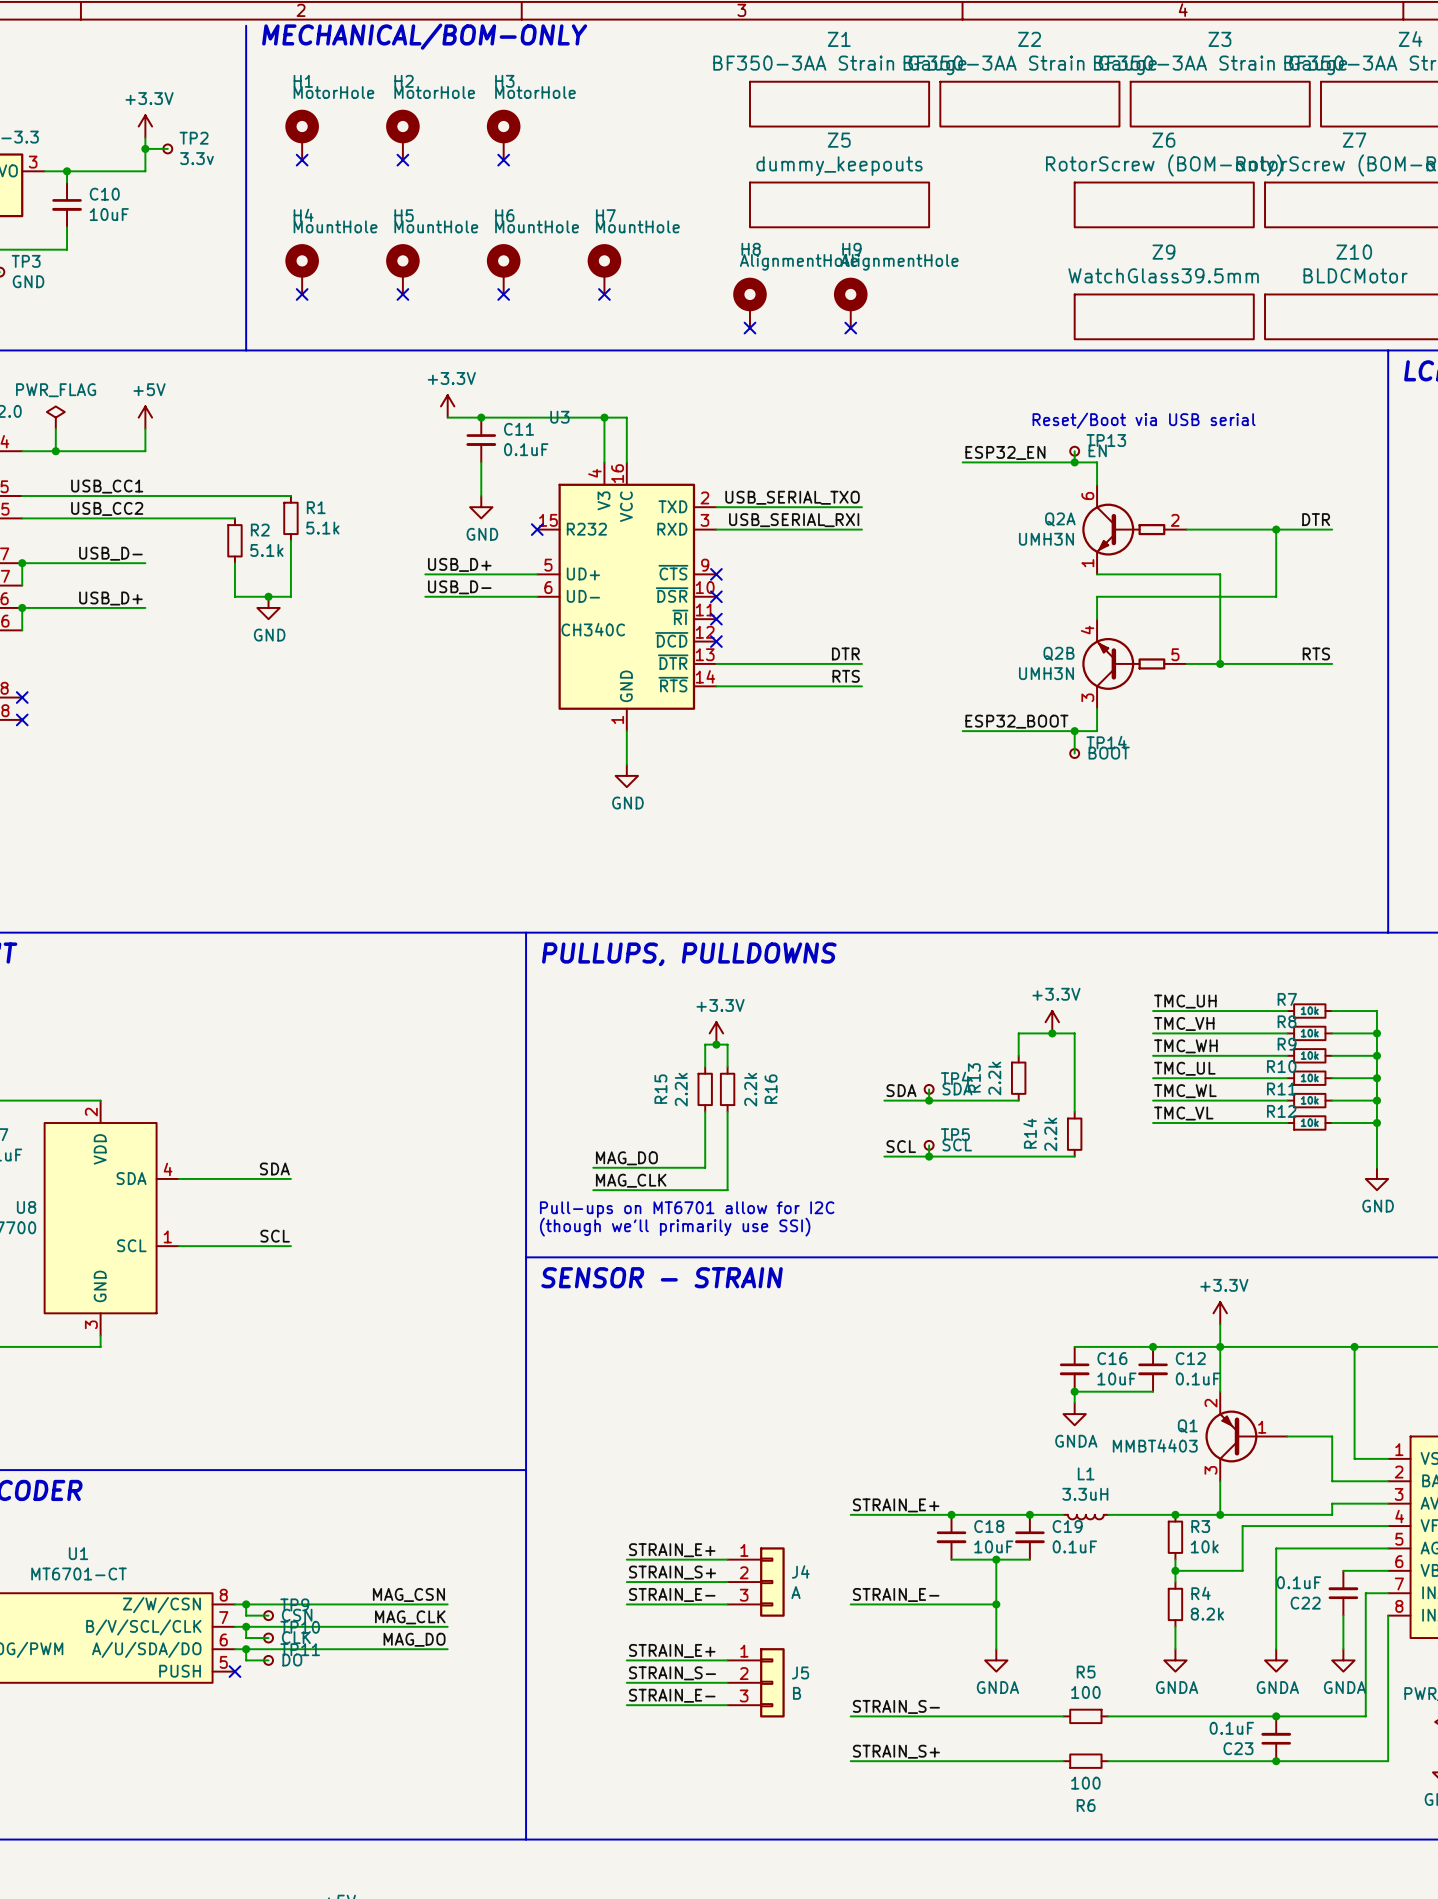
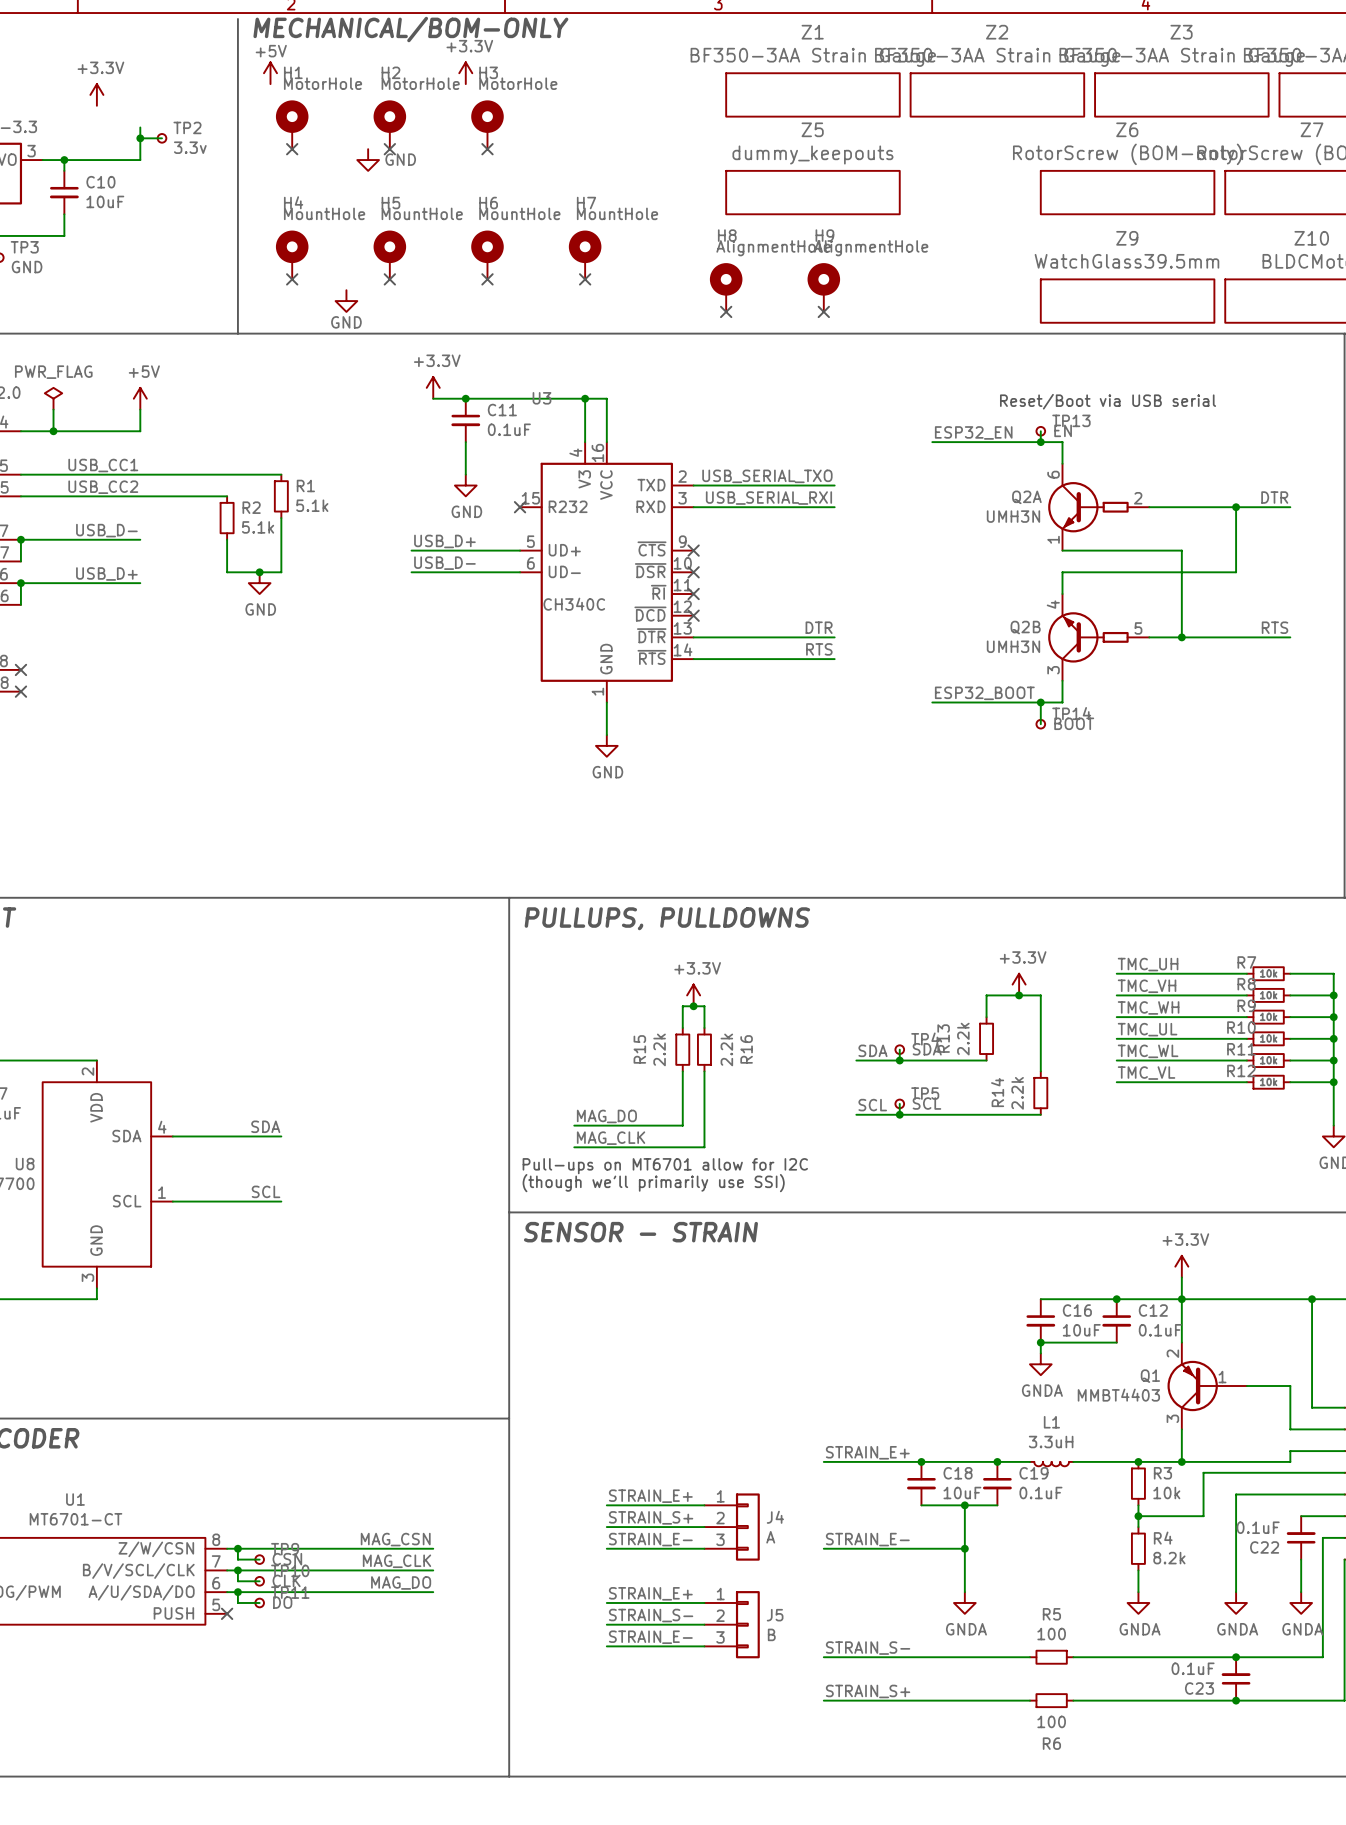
power symbol: none -> +5V (270, 73)
power symbol: none -> +3.3V (465, 73)
power symbol position: +3.3V (145, 126) -> +3.3V (96, 94)
power symbol: none -> GND (368, 160)
power symbol: none -> GND (346, 301)

